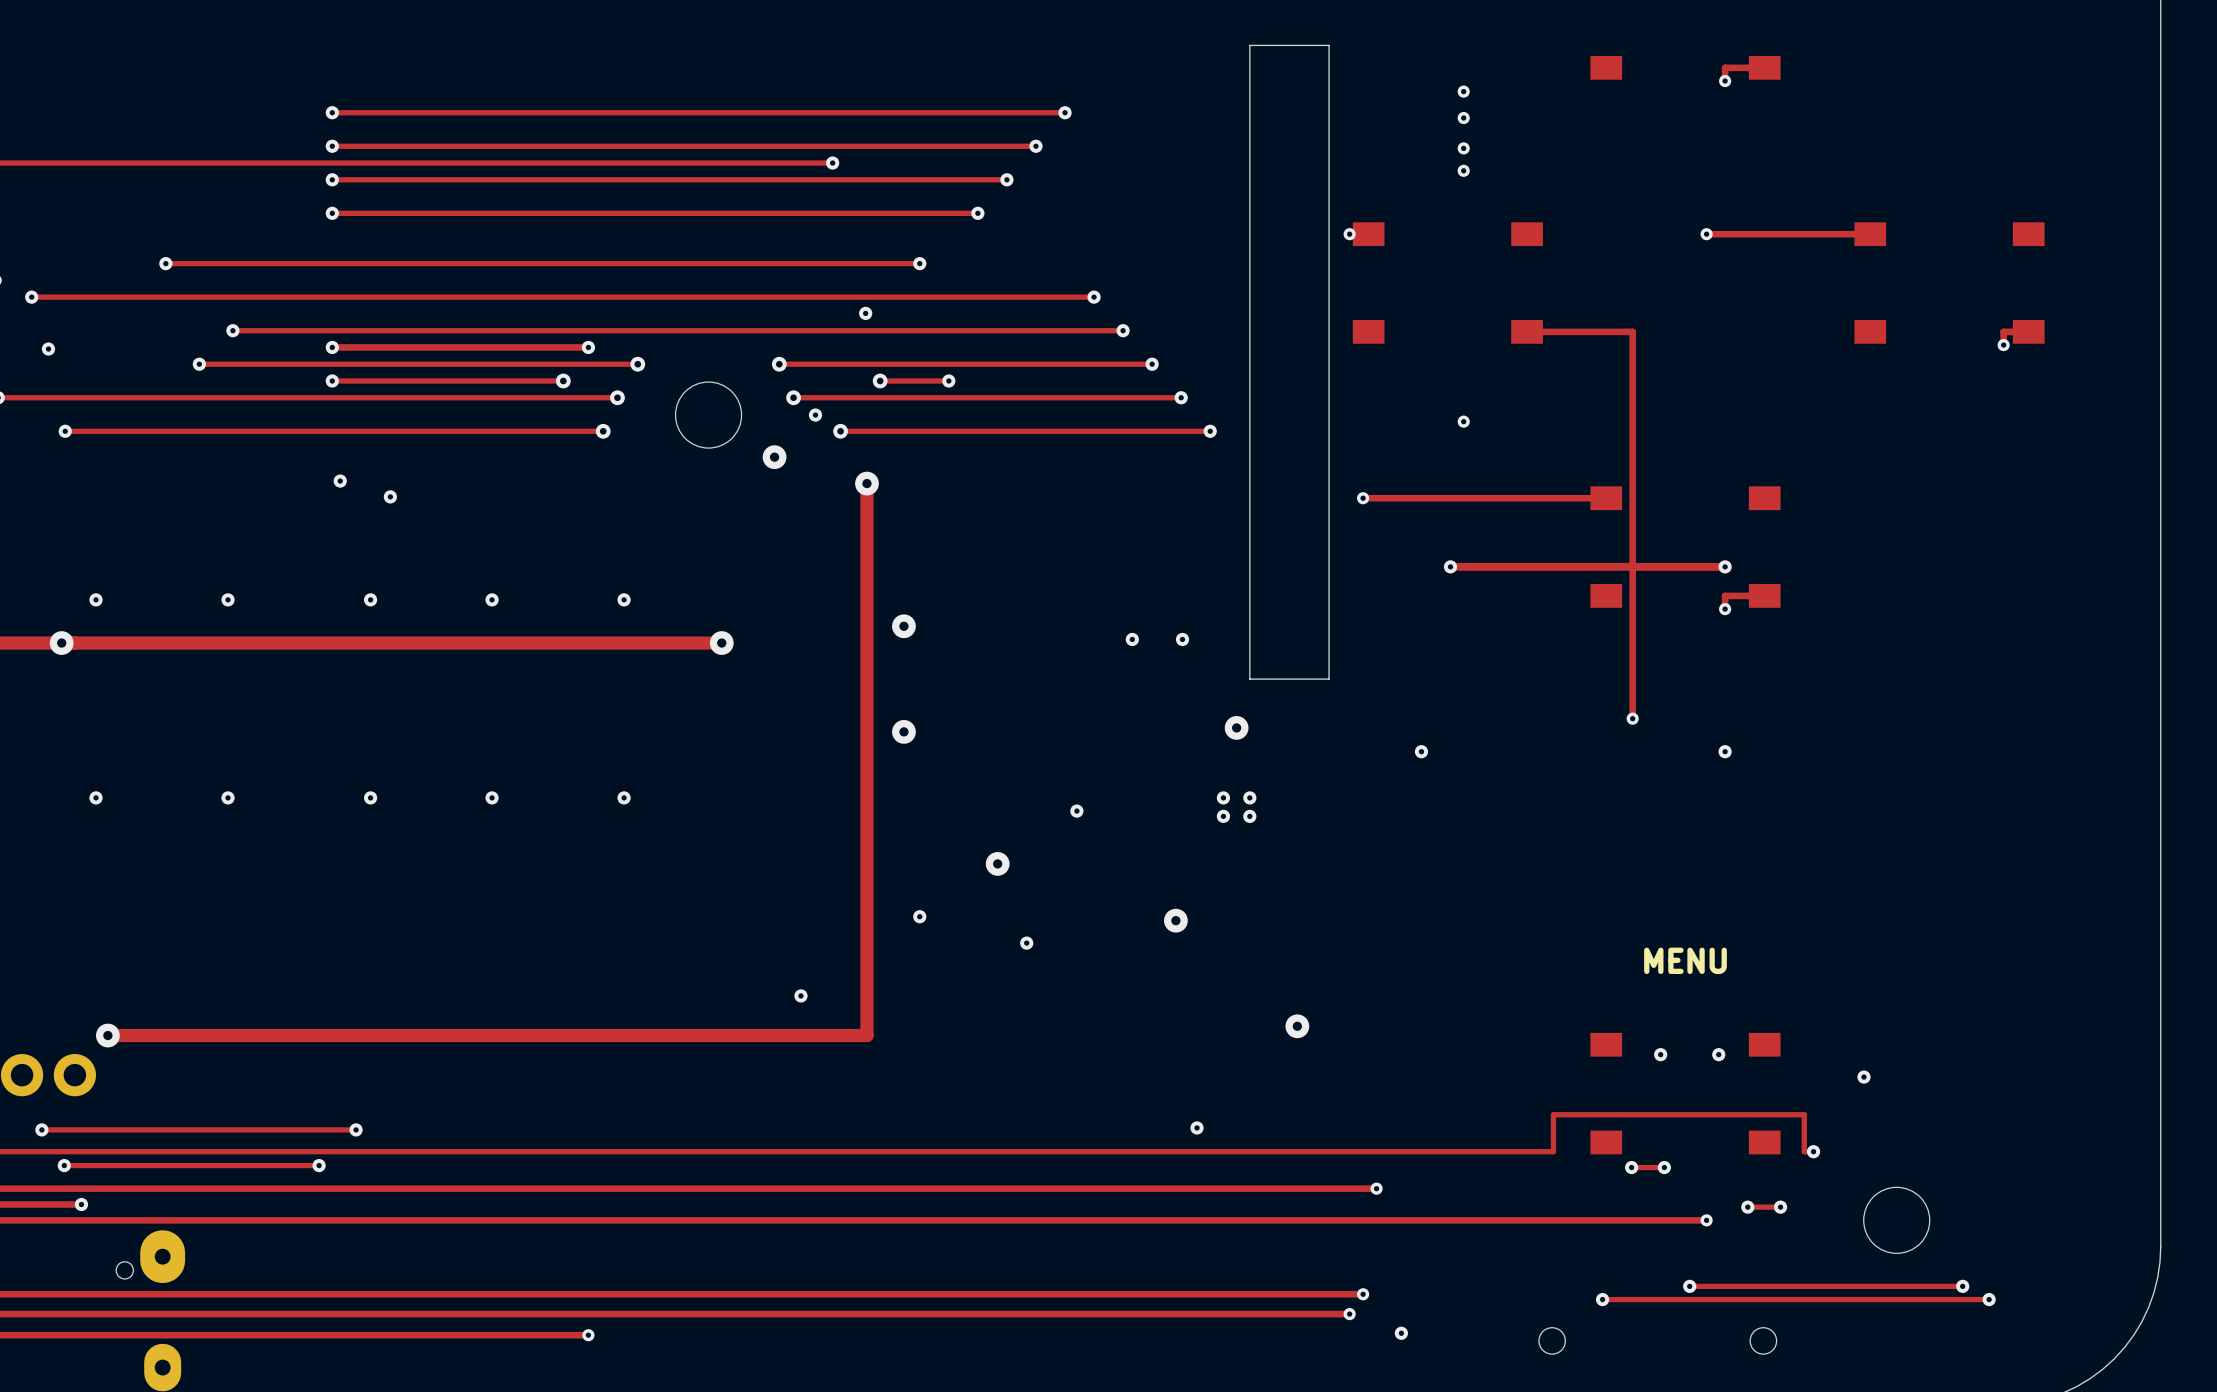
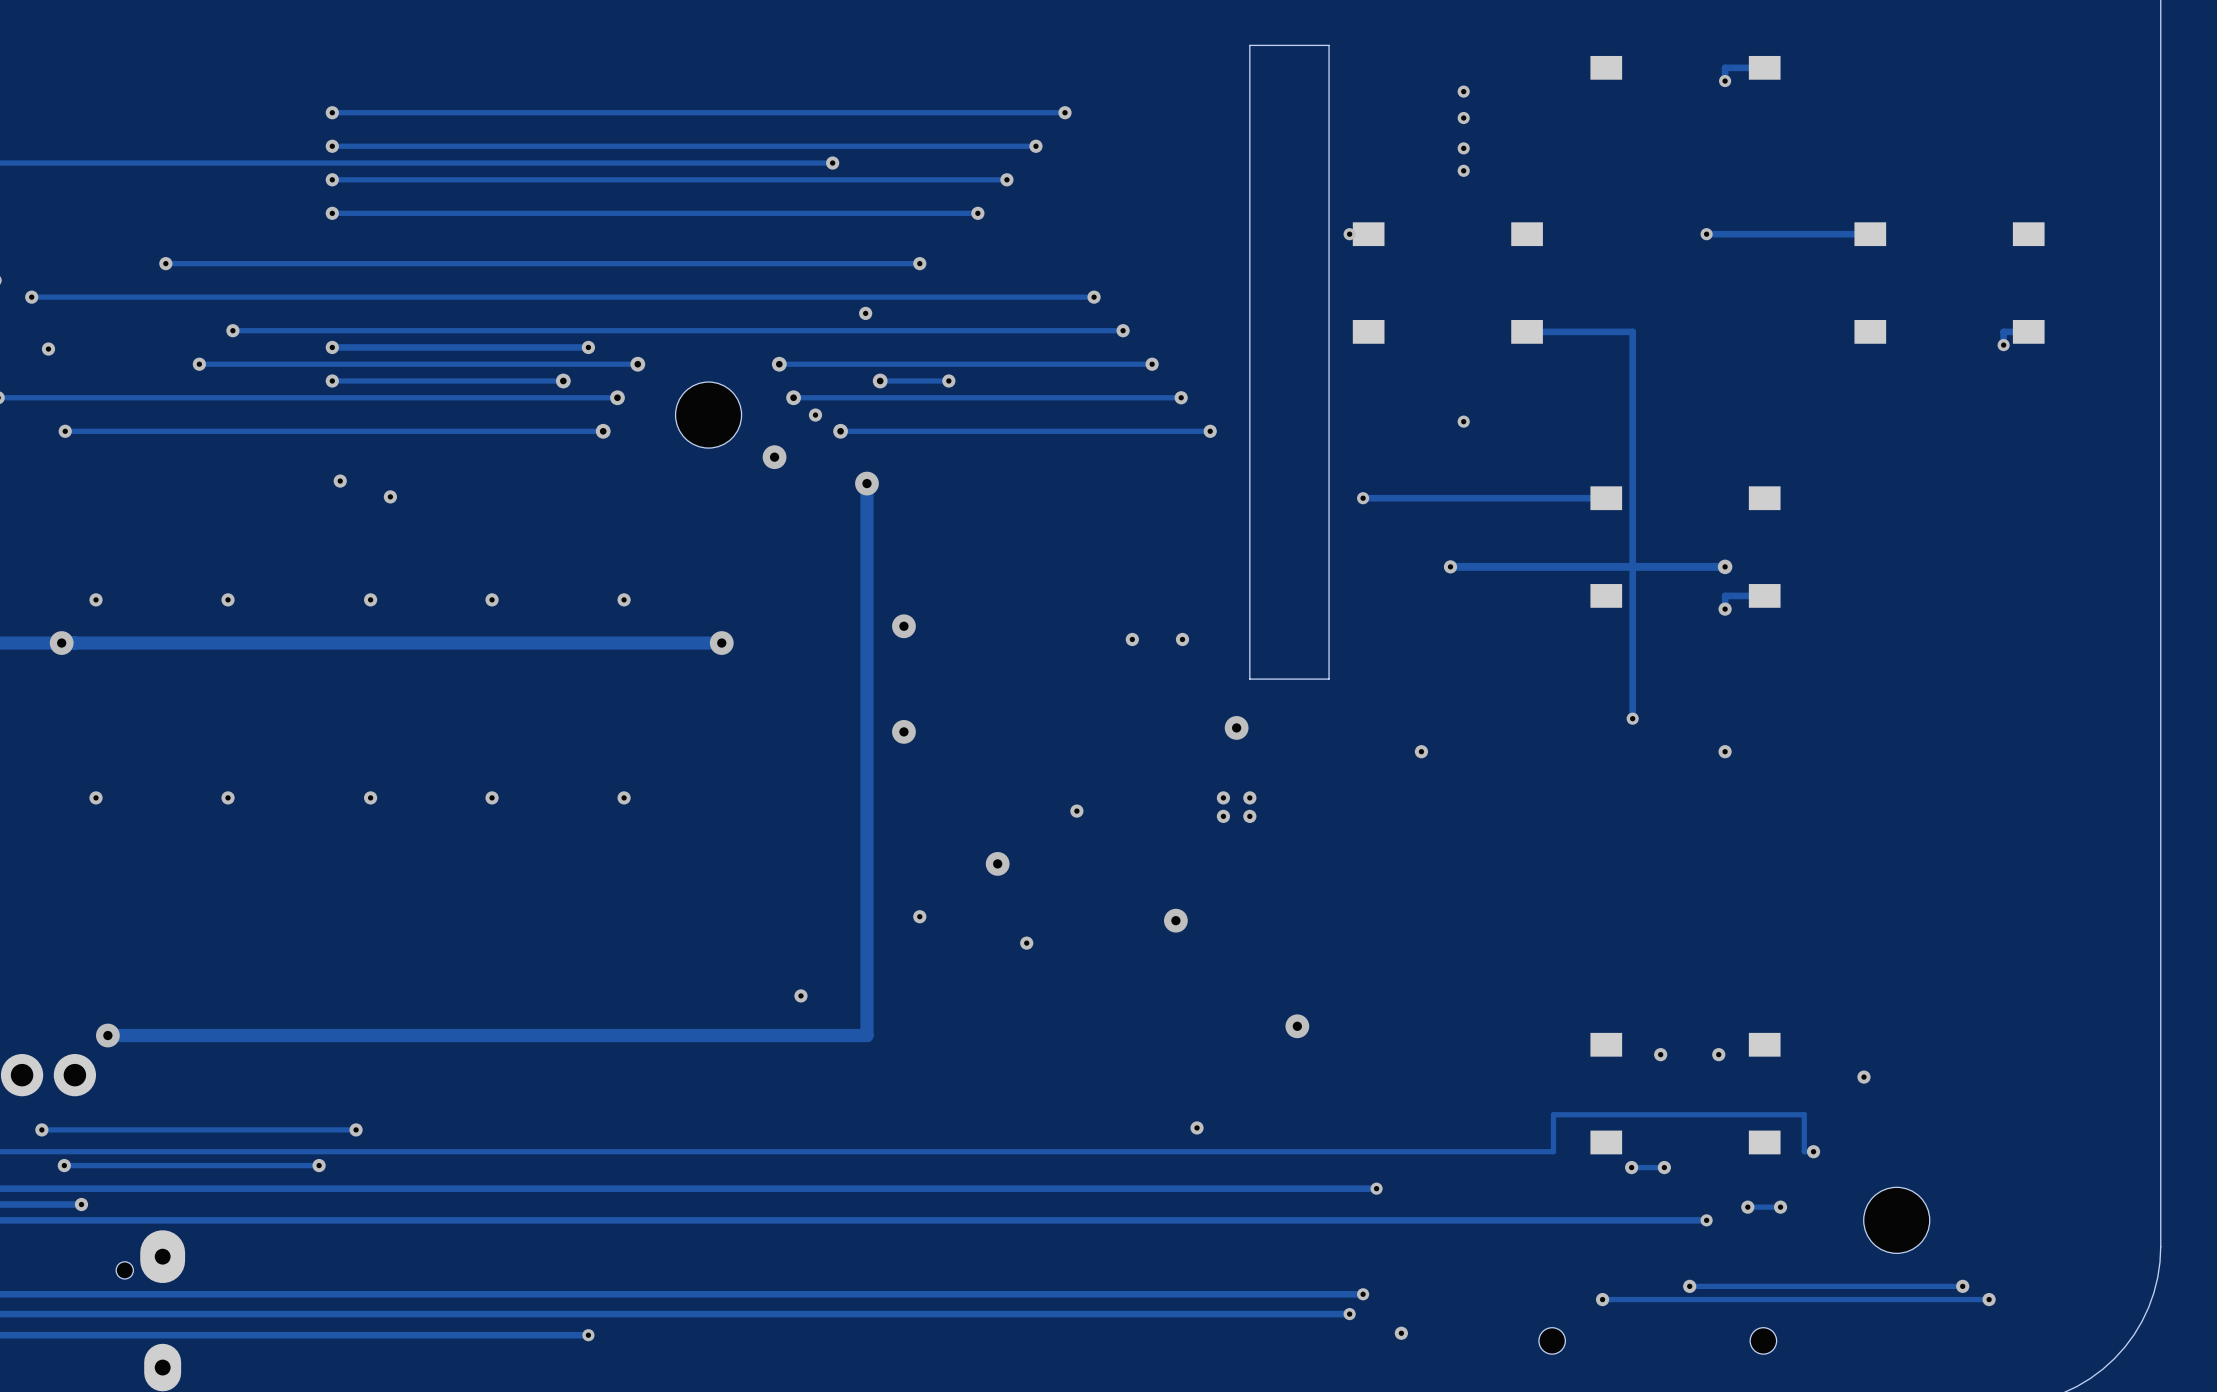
via position: (1725, 566) -> (1725, 609)
via: none -> (1725, 566)
via: (1725, 609) -> none
text: MENU (1685, 960) -> none

